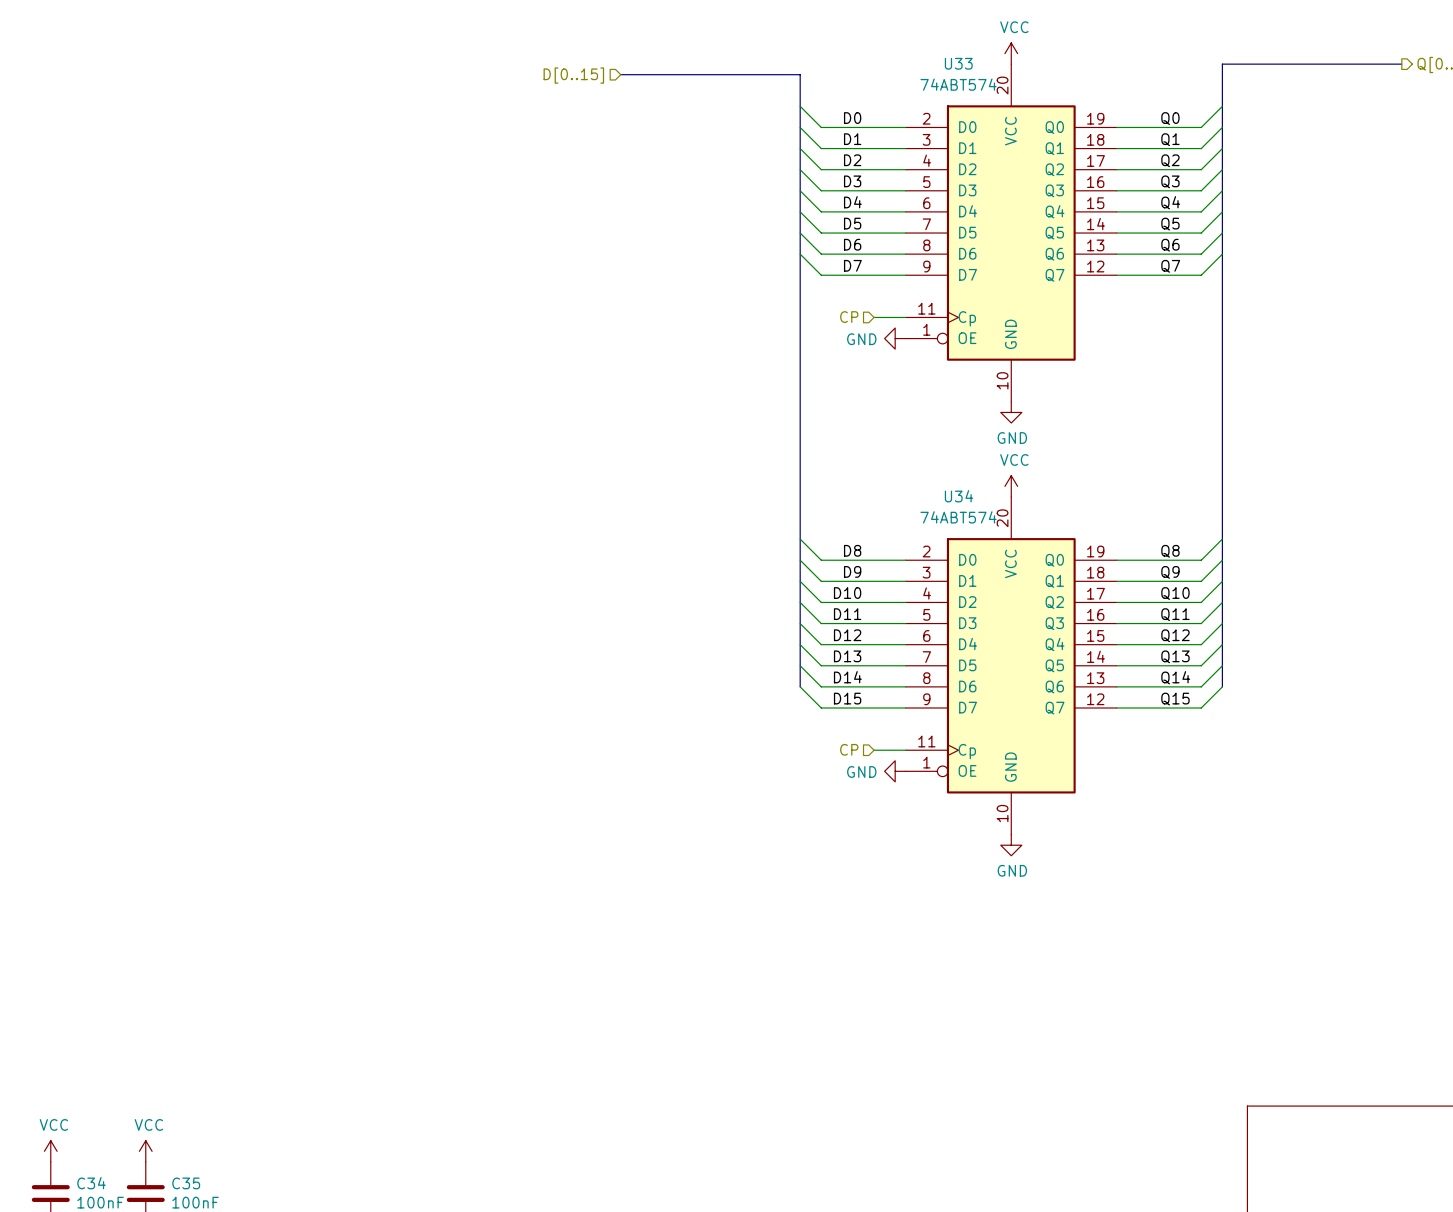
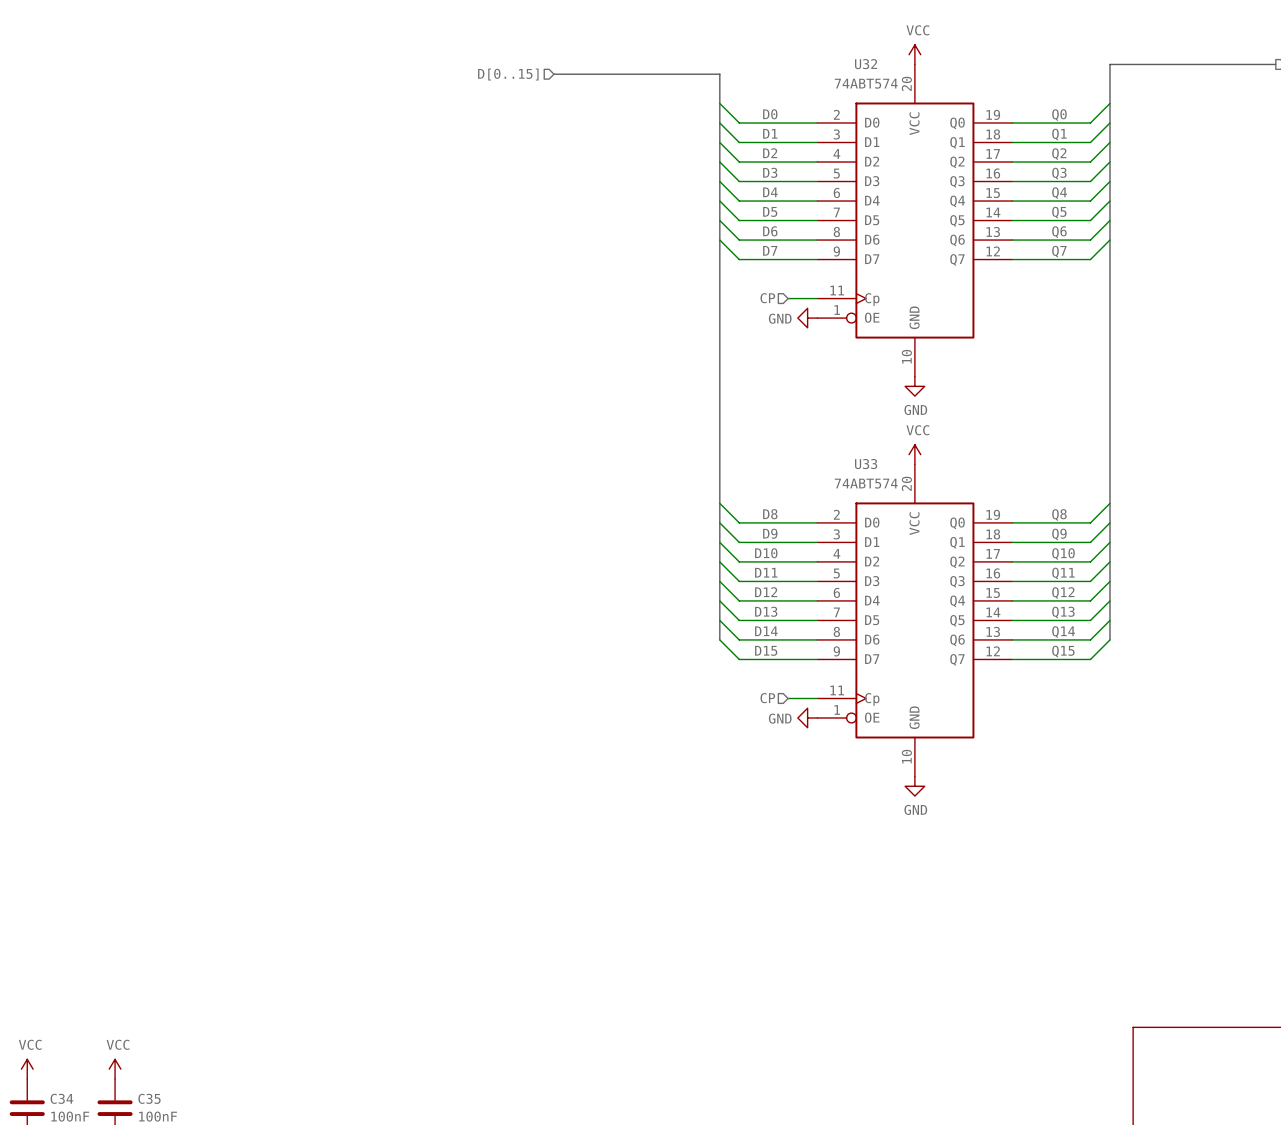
U33 name: U33 (958, 63) -> U32 (866, 64)
U34 name: U34 (959, 496) -> U33 (866, 464)

